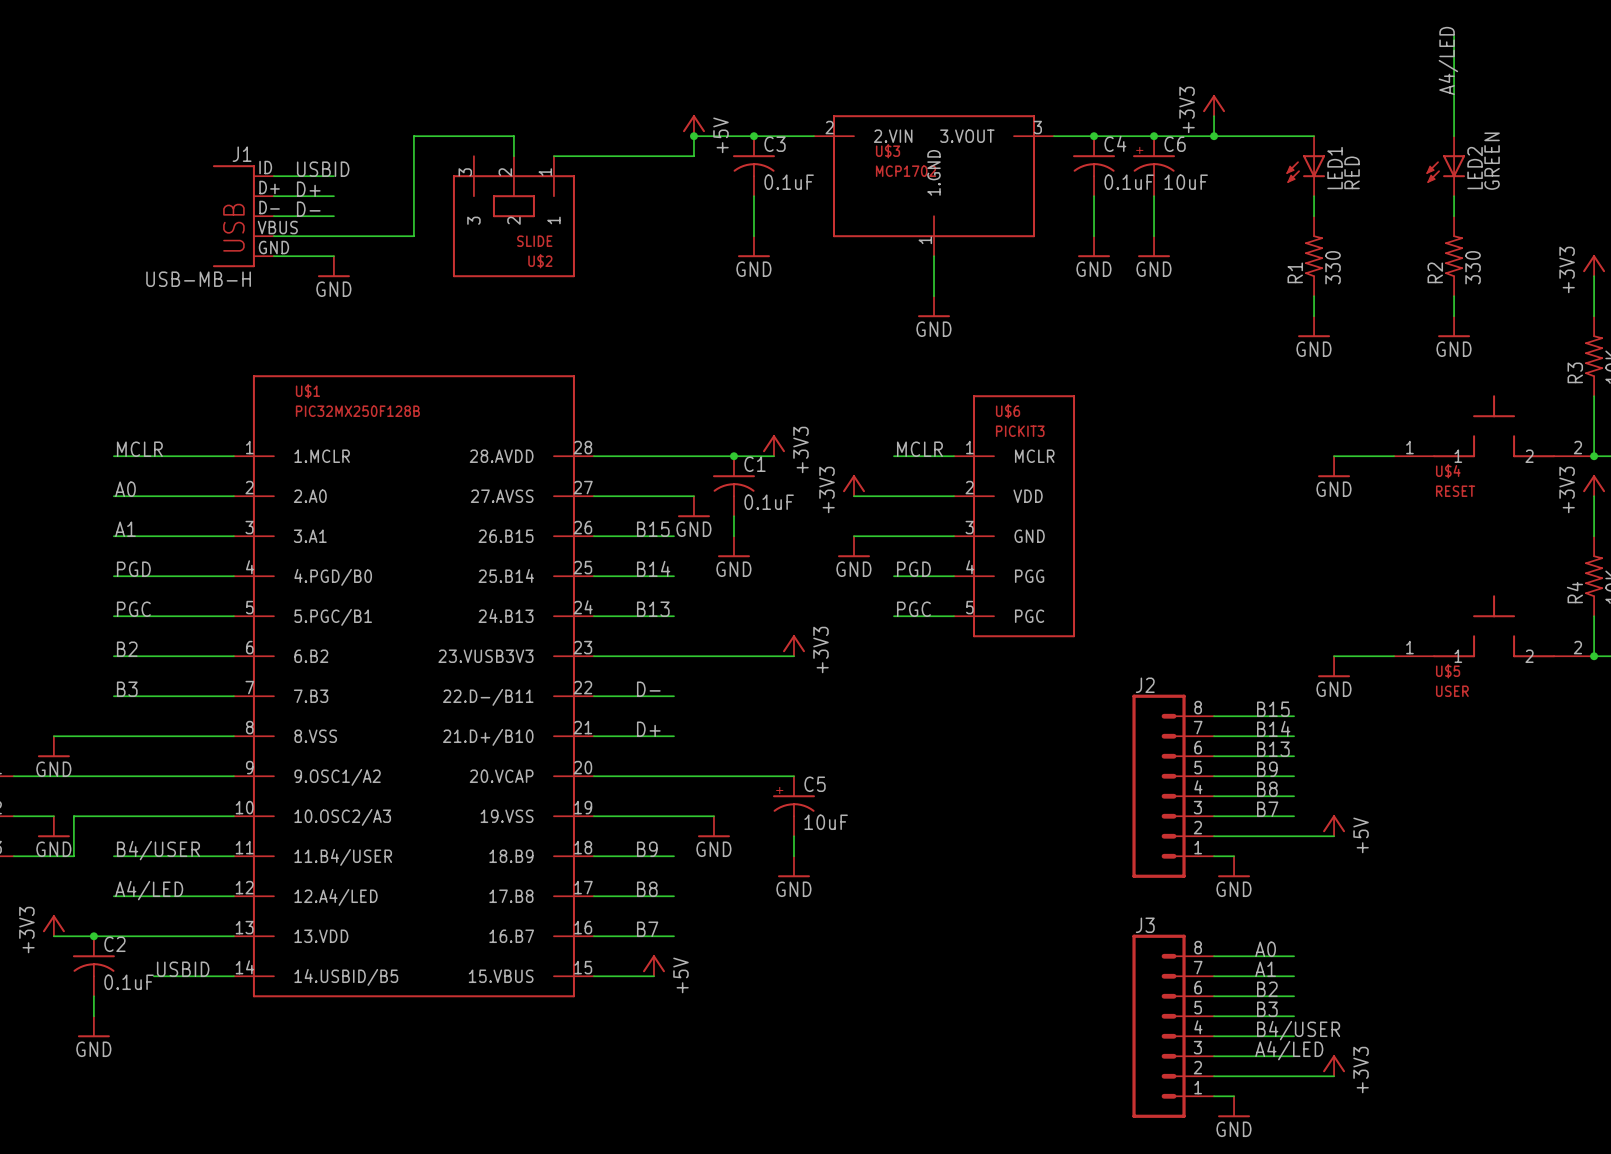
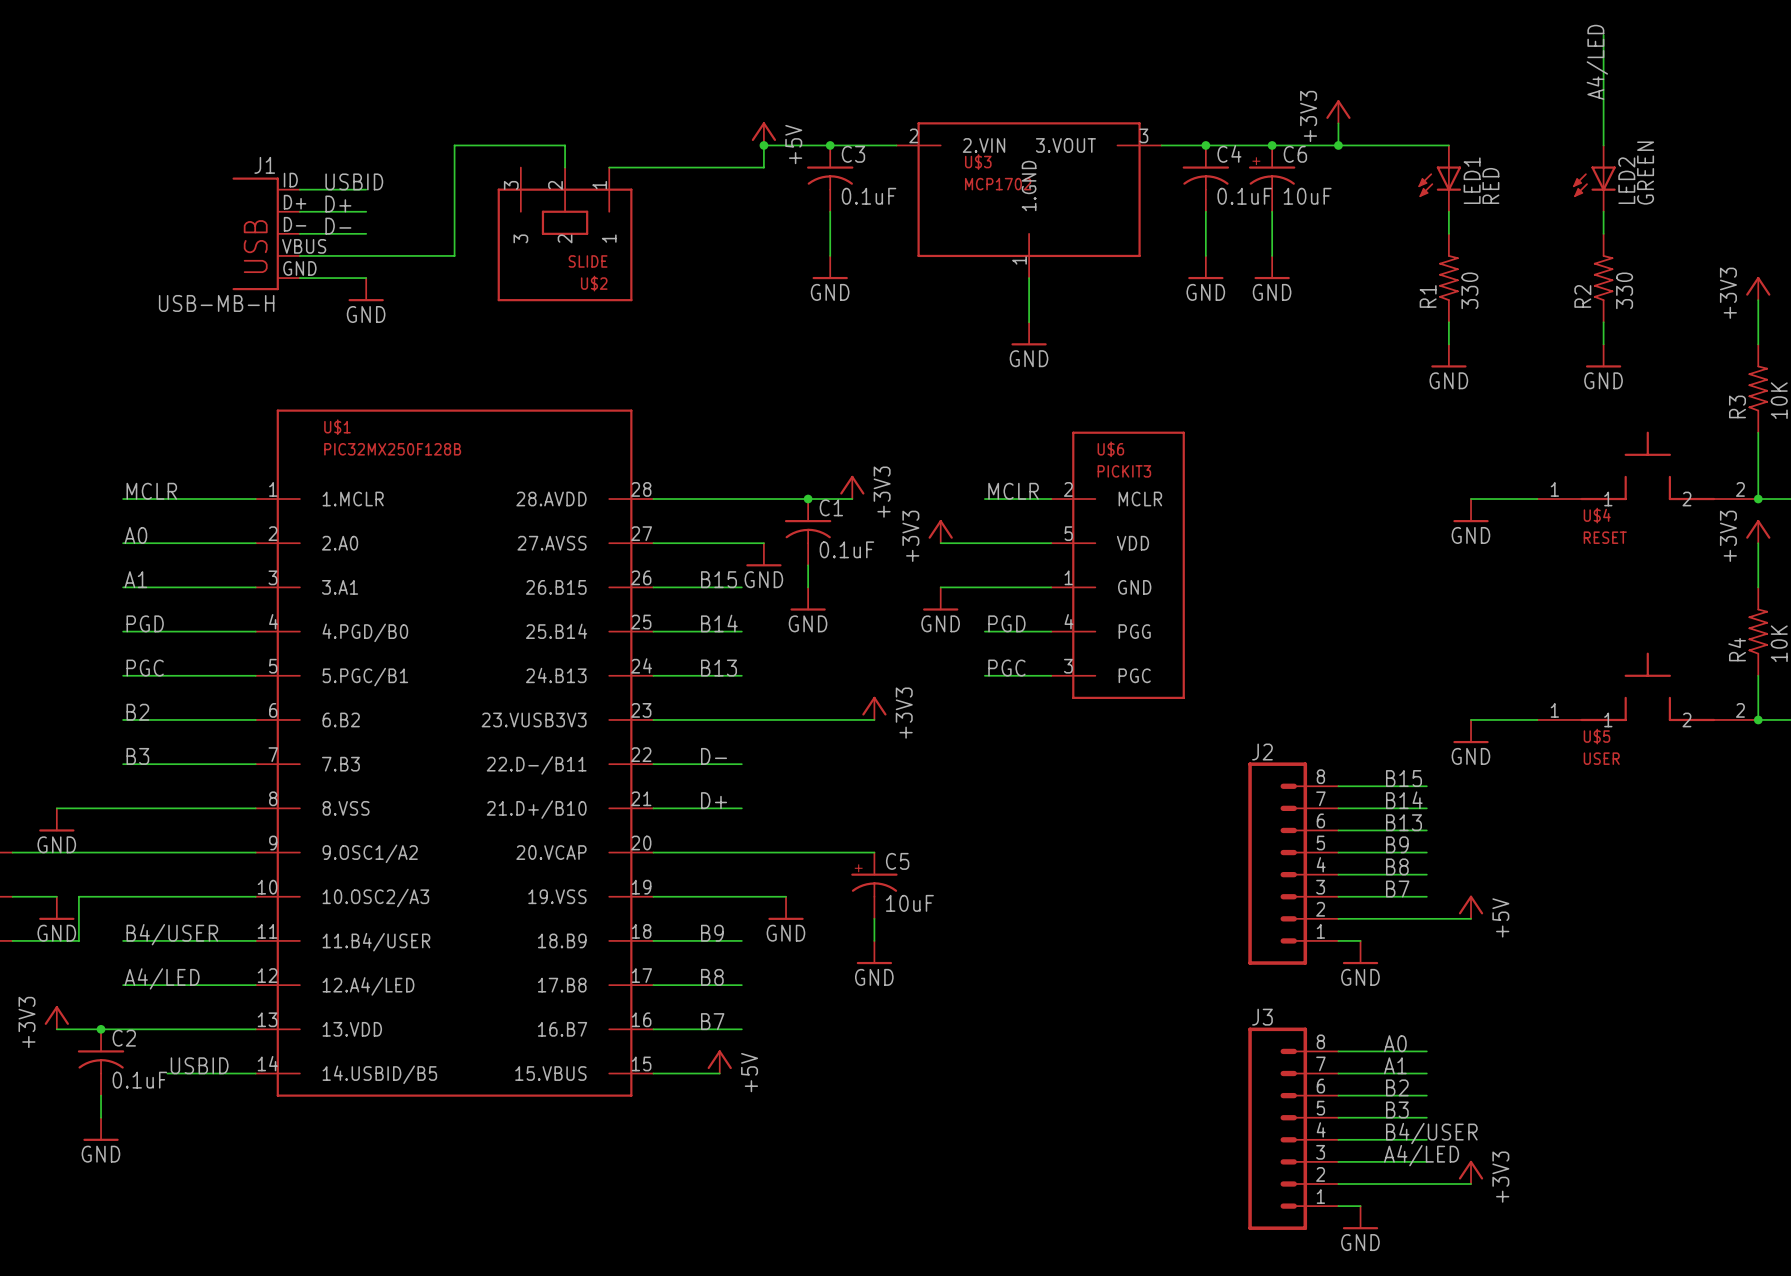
U$6 pin number: 1 (969, 447) -> 2 (1068, 489)
U$6 pin number: 2 (969, 487) -> 5 (1068, 533)
U$6 pin number: 3 (969, 527) -> 1 (1068, 577)
U$6 pin number: 5 (969, 607) -> 3 (1068, 666)

